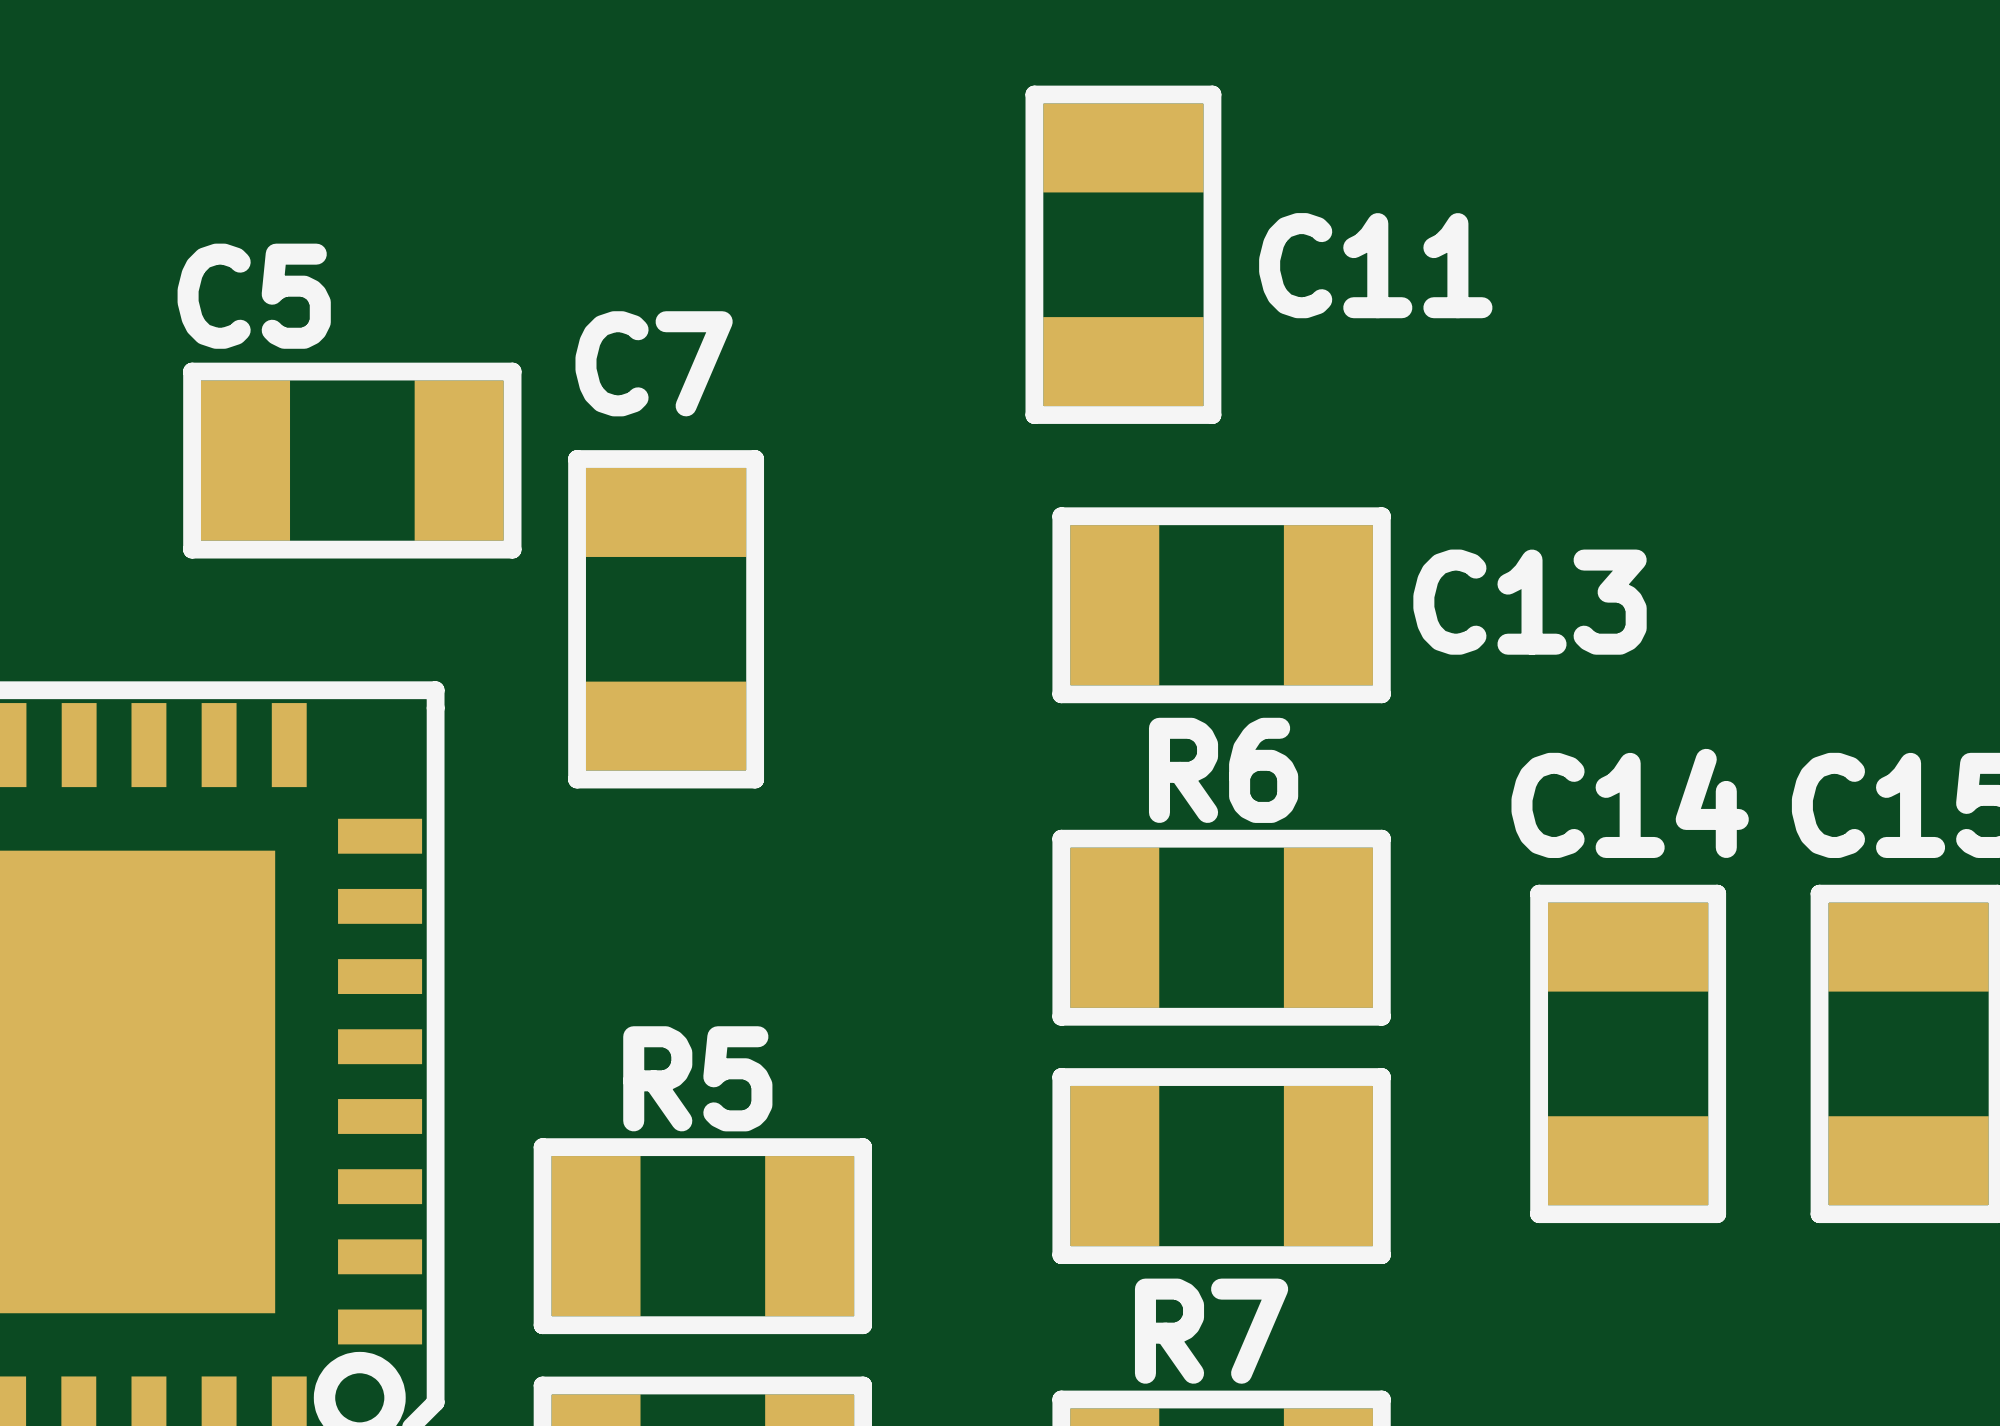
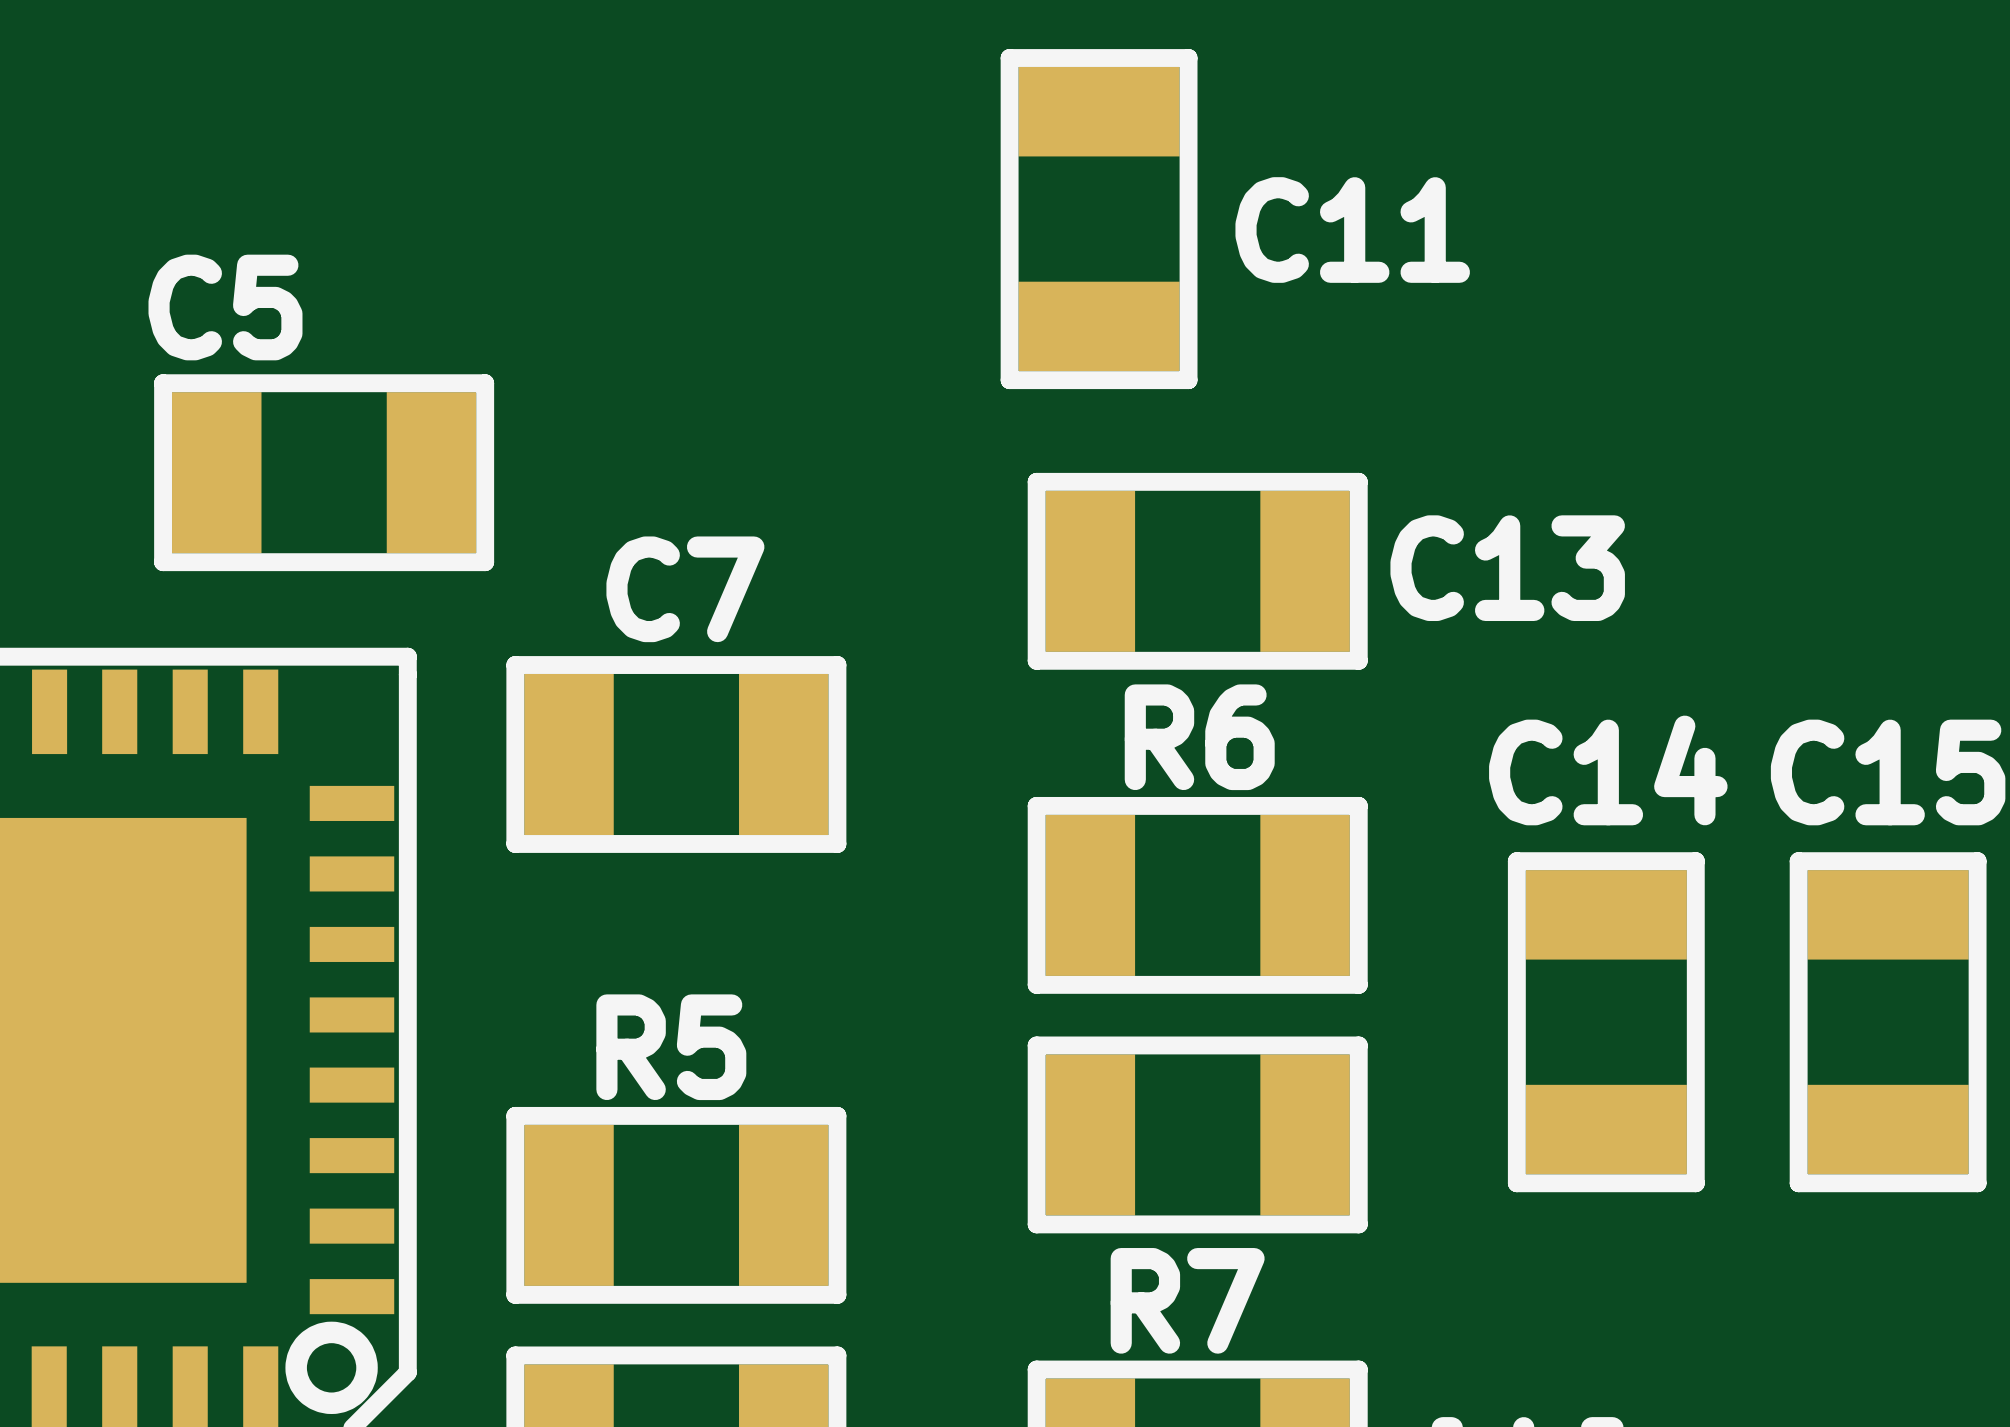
C5 position: (352, 460) -> (324, 472)
C7 rotation: 0° (666, 619) -> 90° clockwise (676, 754)

